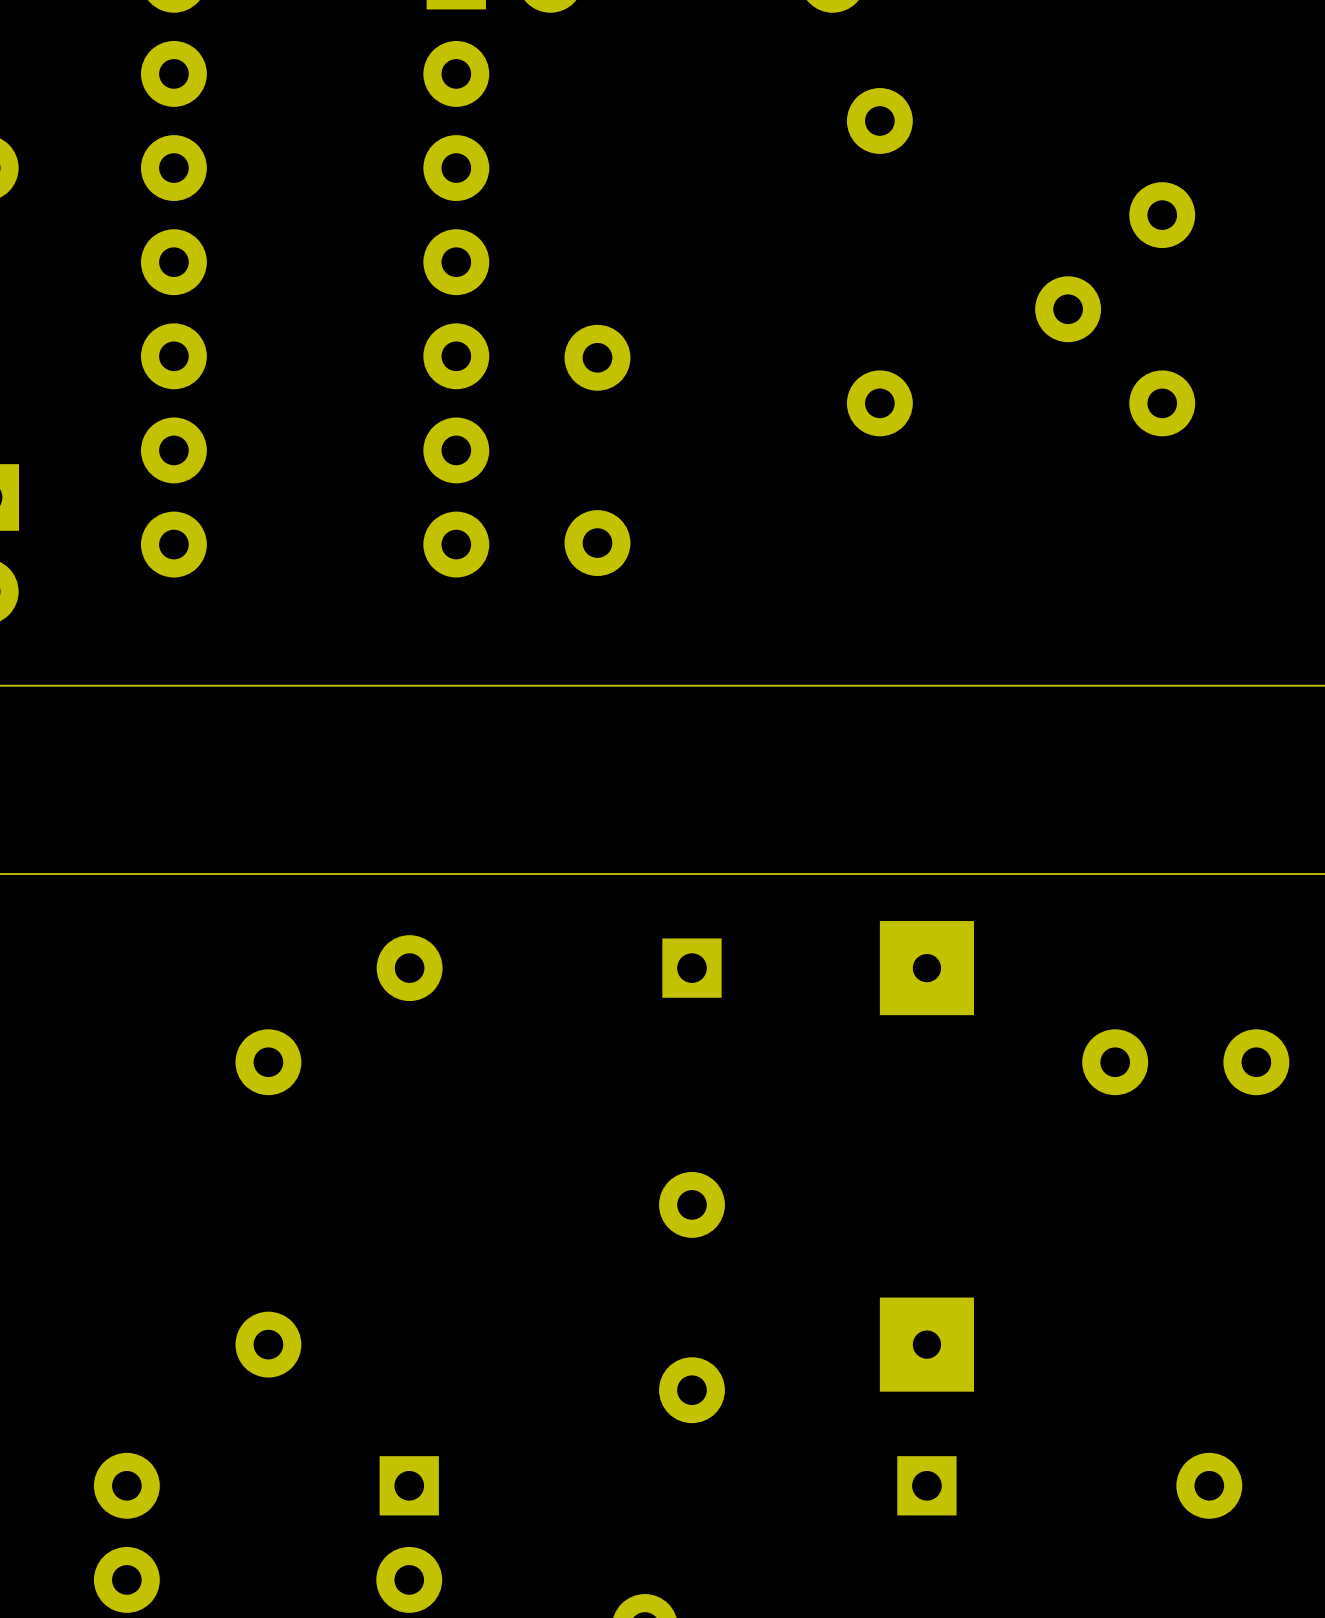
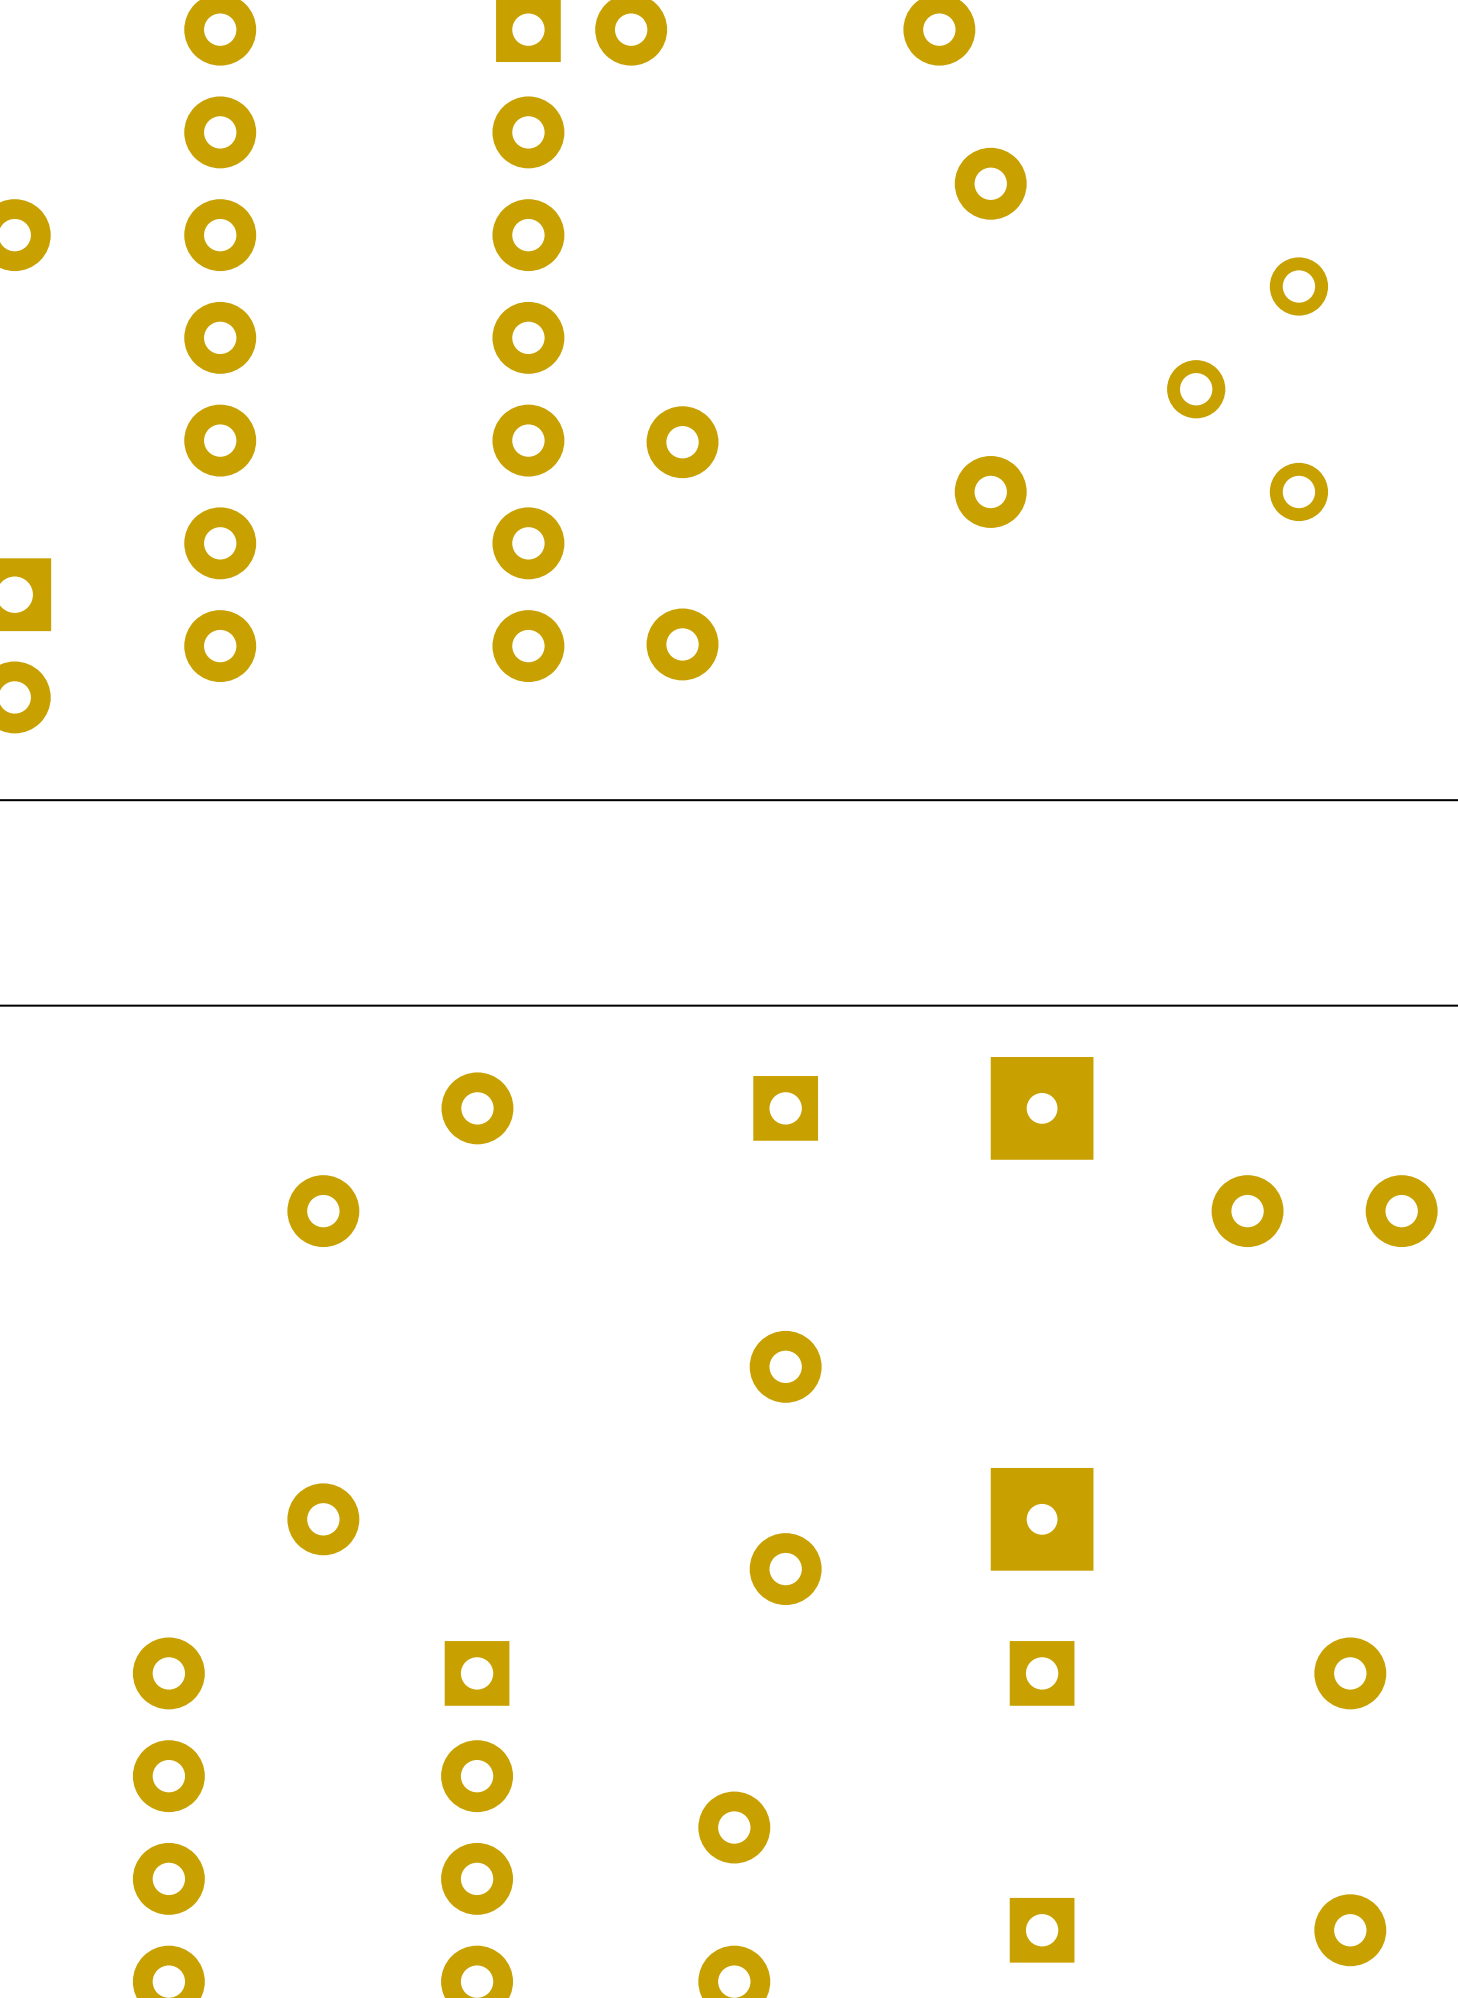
part footprint: [1035, 182, 1196, 437] -> [1167, 257, 1329, 522]

